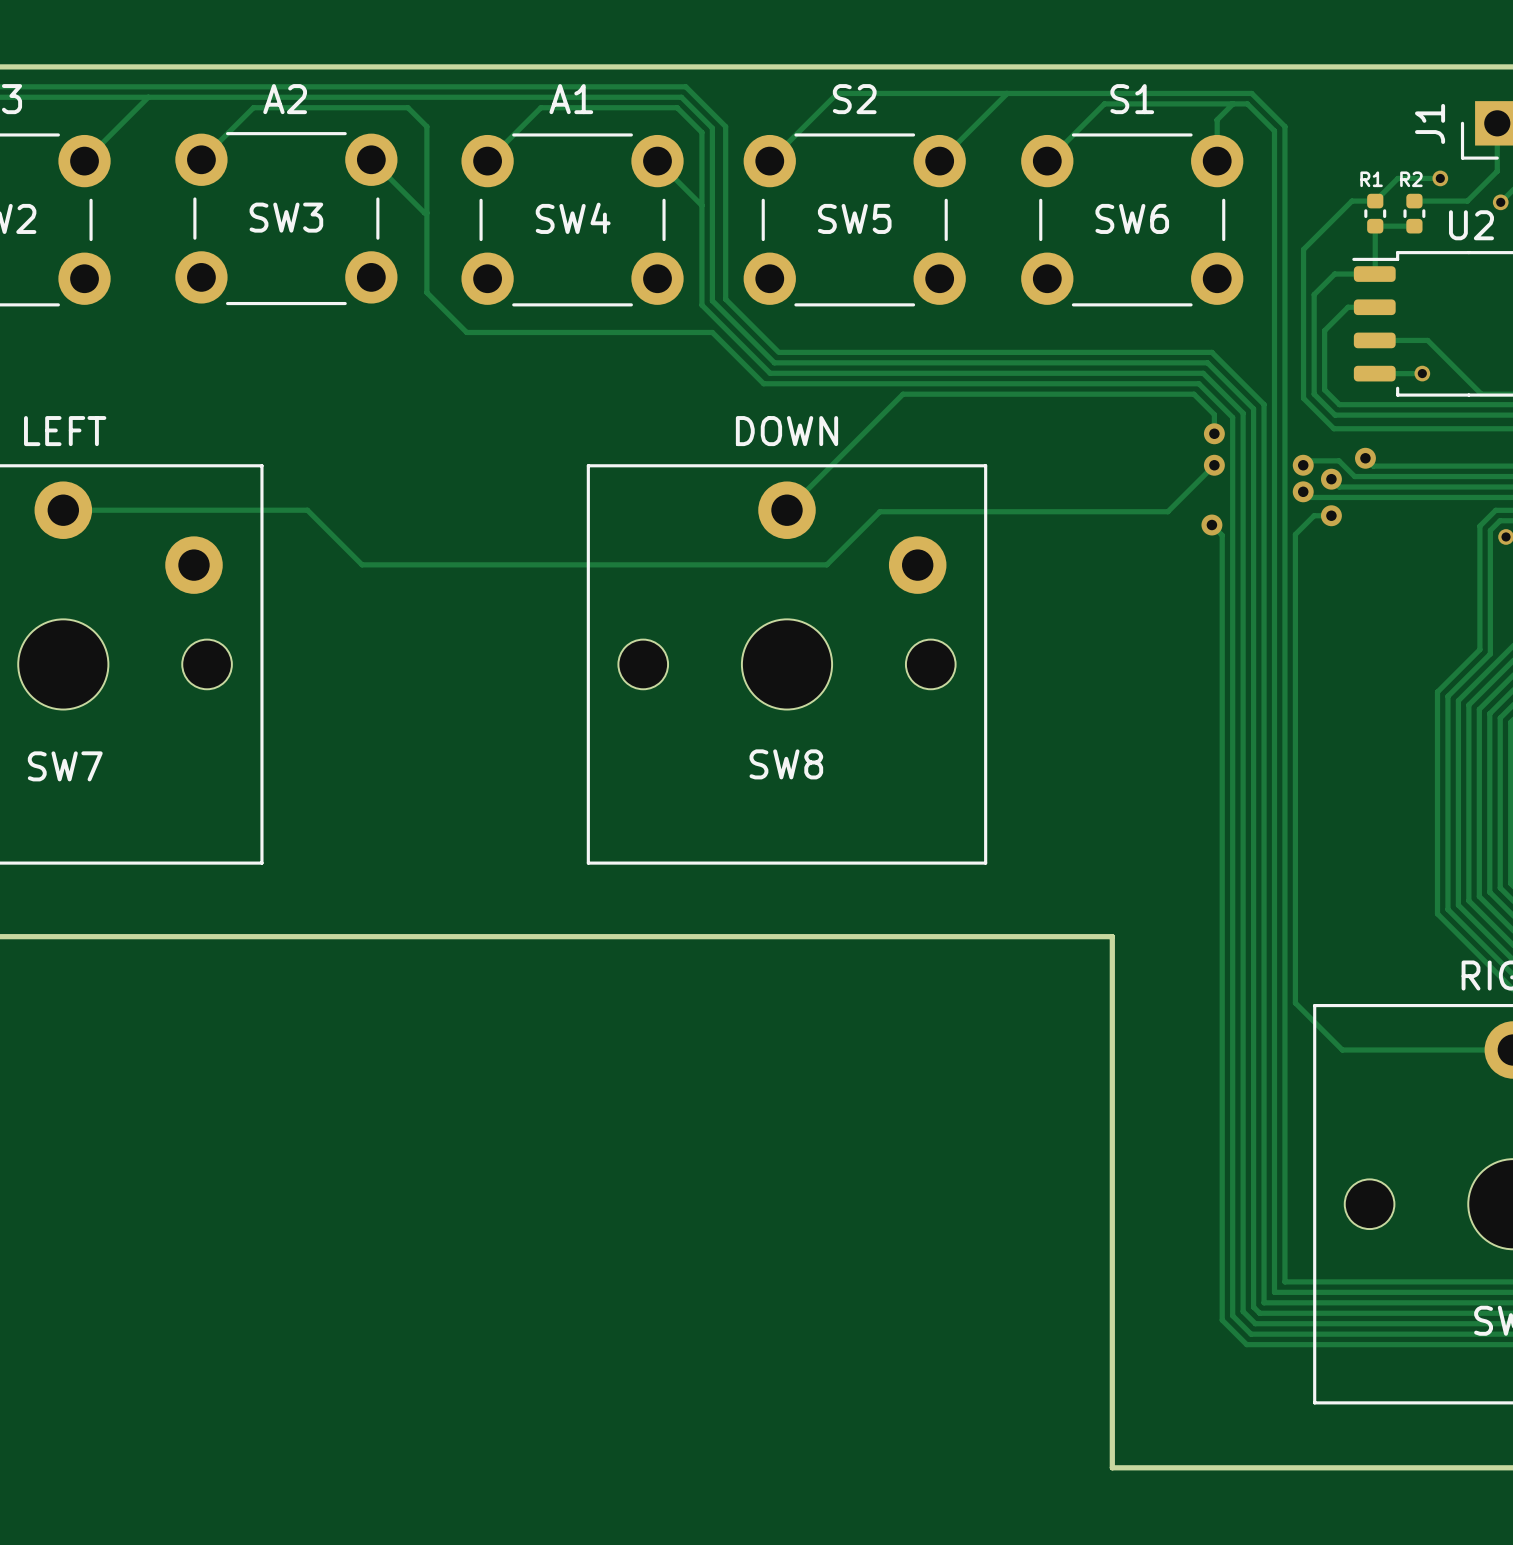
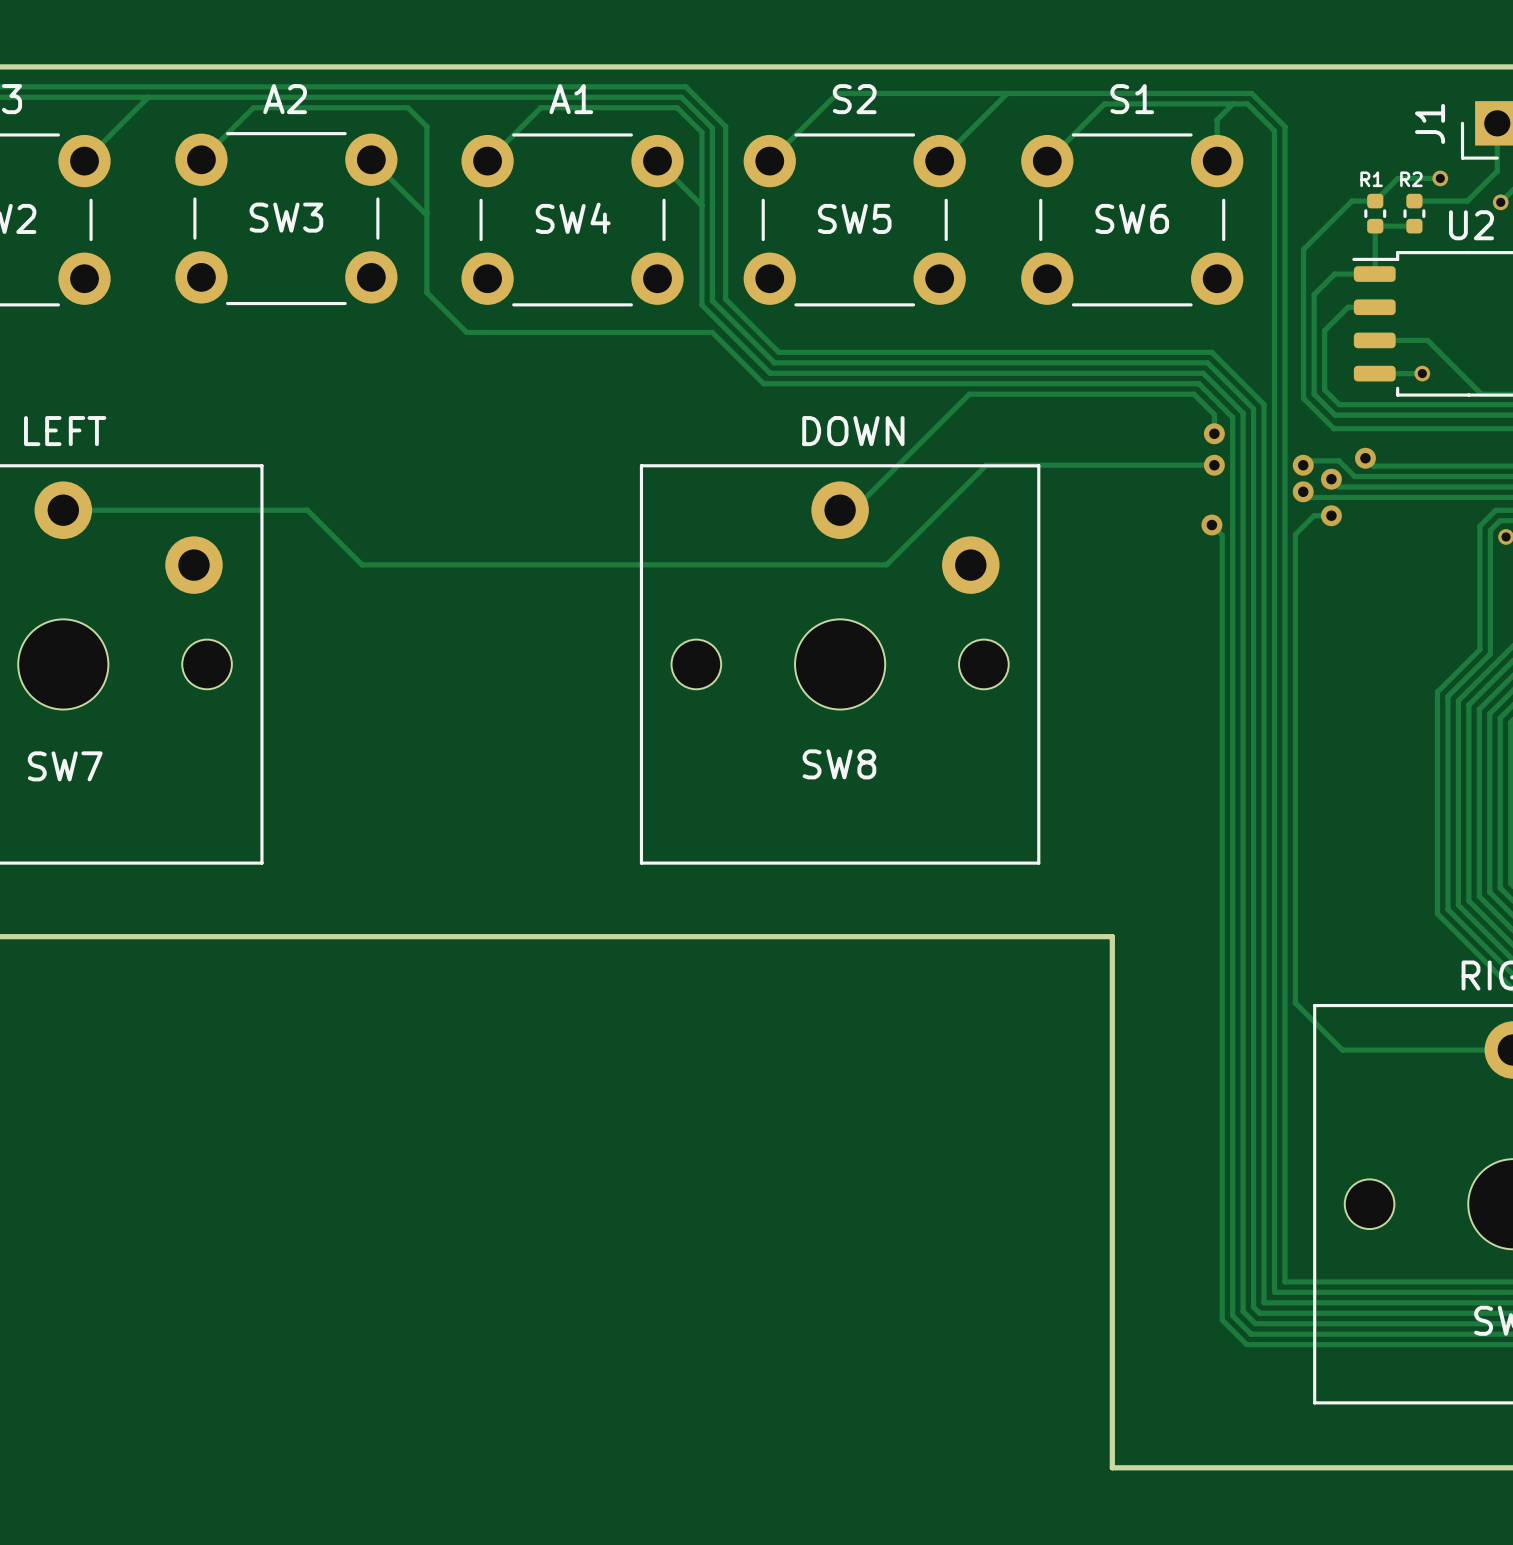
track: (969, 394) (903, 394) (787, 510) -> (969, 394) (853, 510) (840, 510)
text position: DOWN (787, 431) -> DOWN (853, 431)
track: (1214, 465) (1167, 511) (879, 511) (826, 564) -> (1214, 465) (986, 465) (886, 564) (826, 564)
SW8 position: (787, 664) -> (840, 664)

